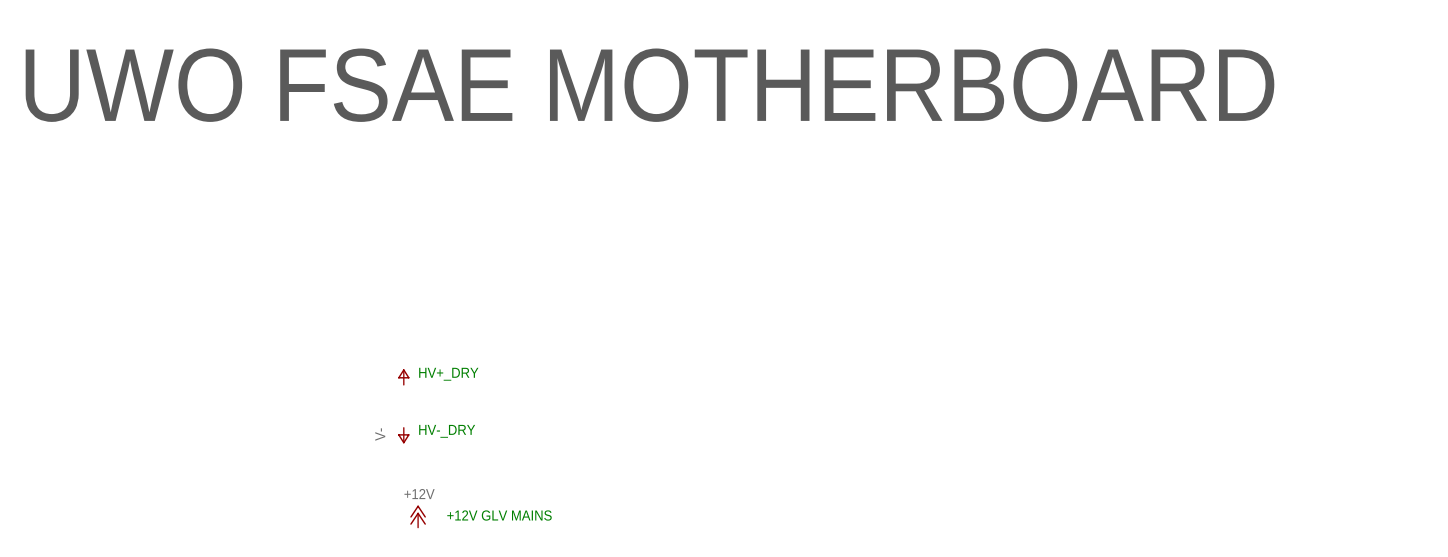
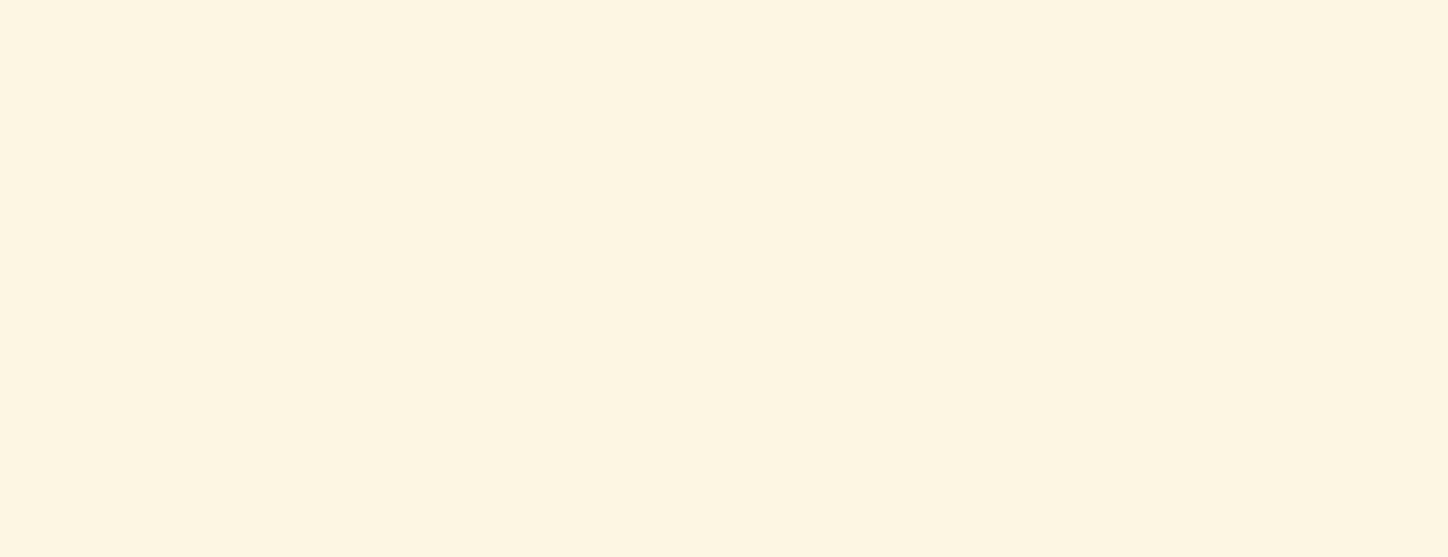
text: UWO FSAE MOTHERBOARD (649, 85) -> none
text: HV+_DRY (448, 374) -> none
power symbol: (403, 377) -> none
text: HV-_DRY (447, 431) -> none
power symbol: V- (403, 435) -> none
text: +12V GLV MAINS (499, 515) -> none
power symbol: +12V (418, 516) -> none

